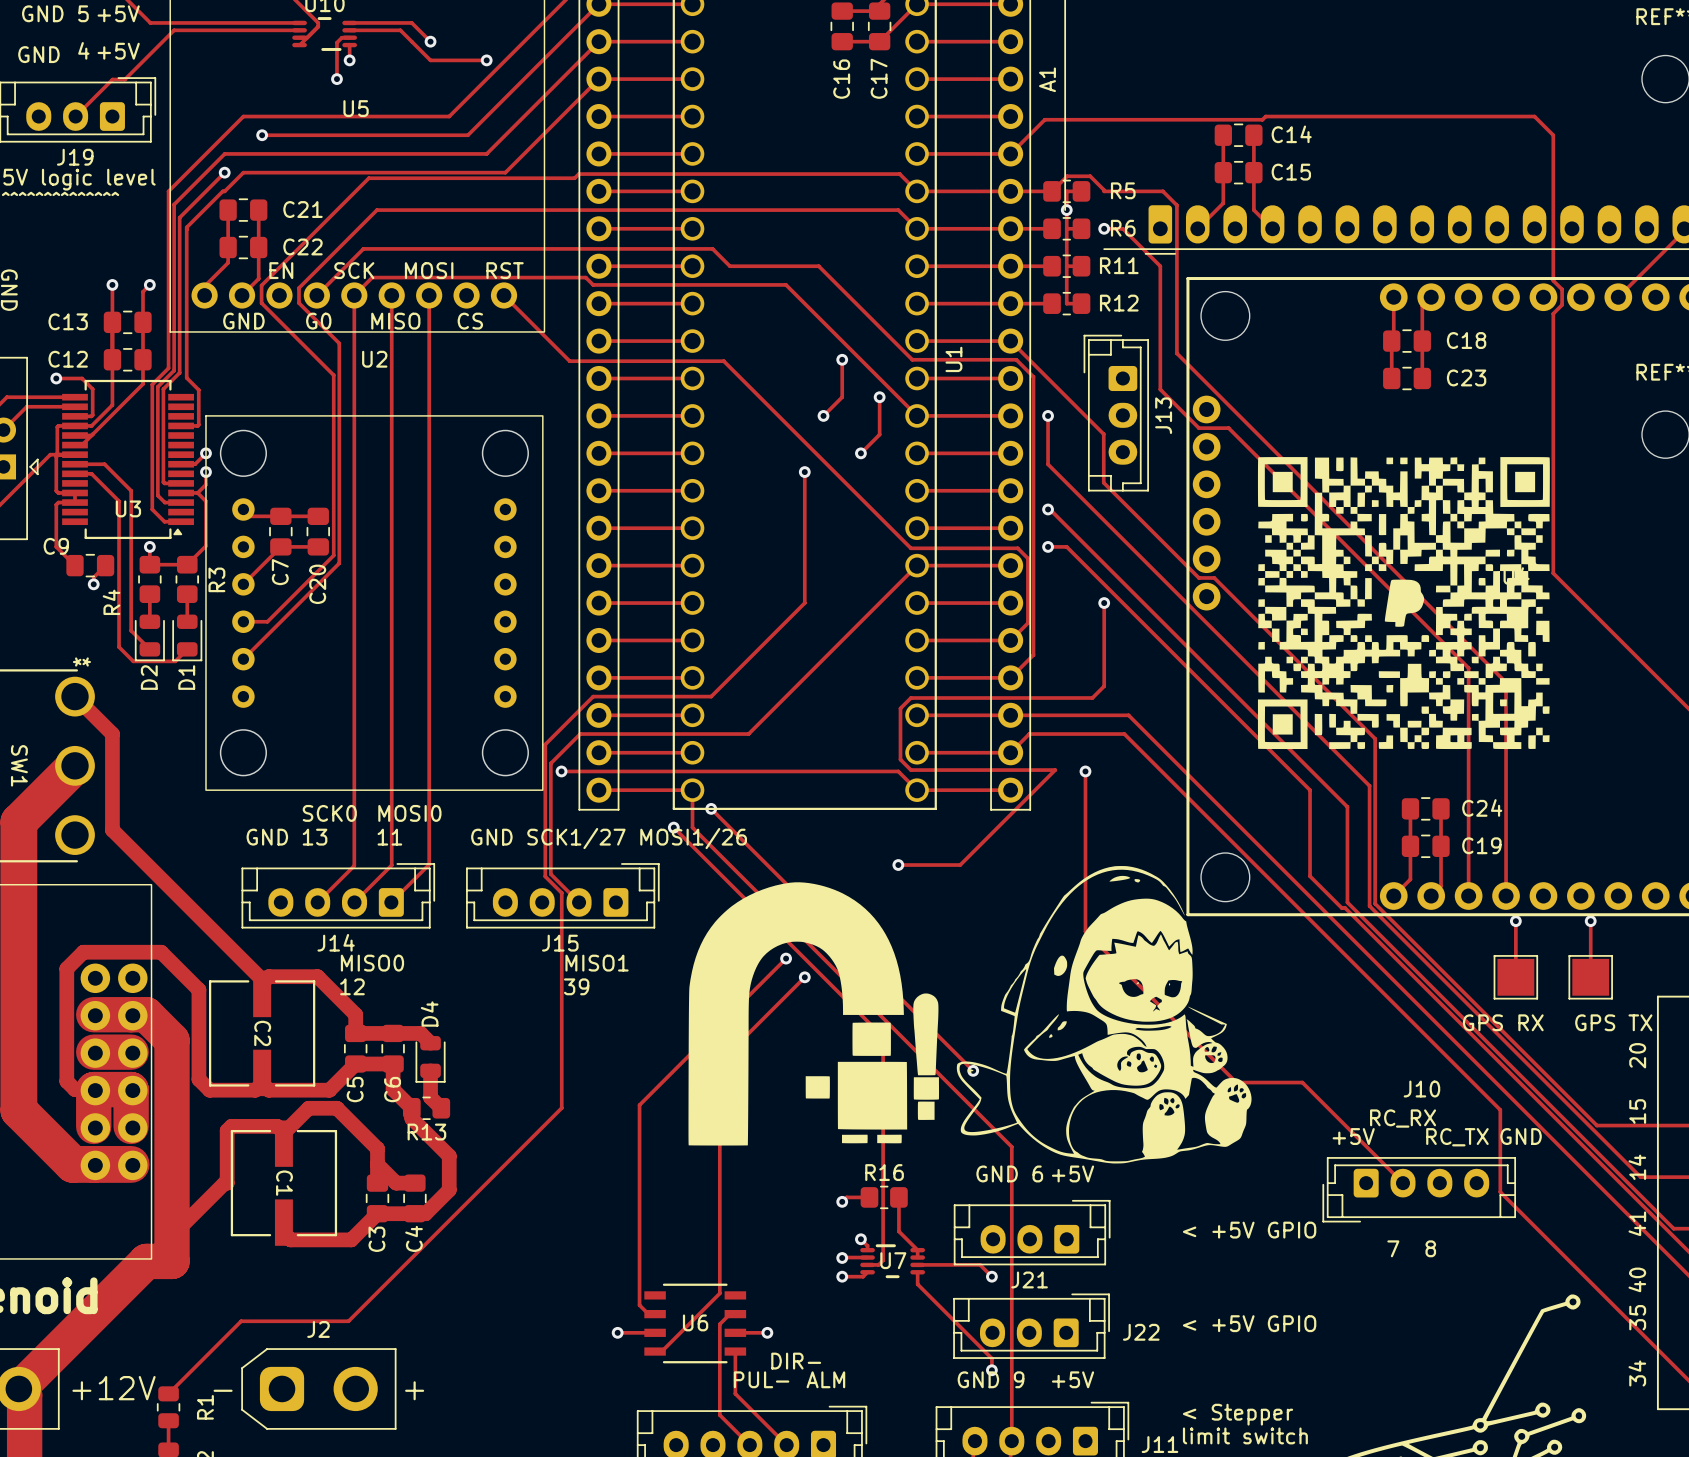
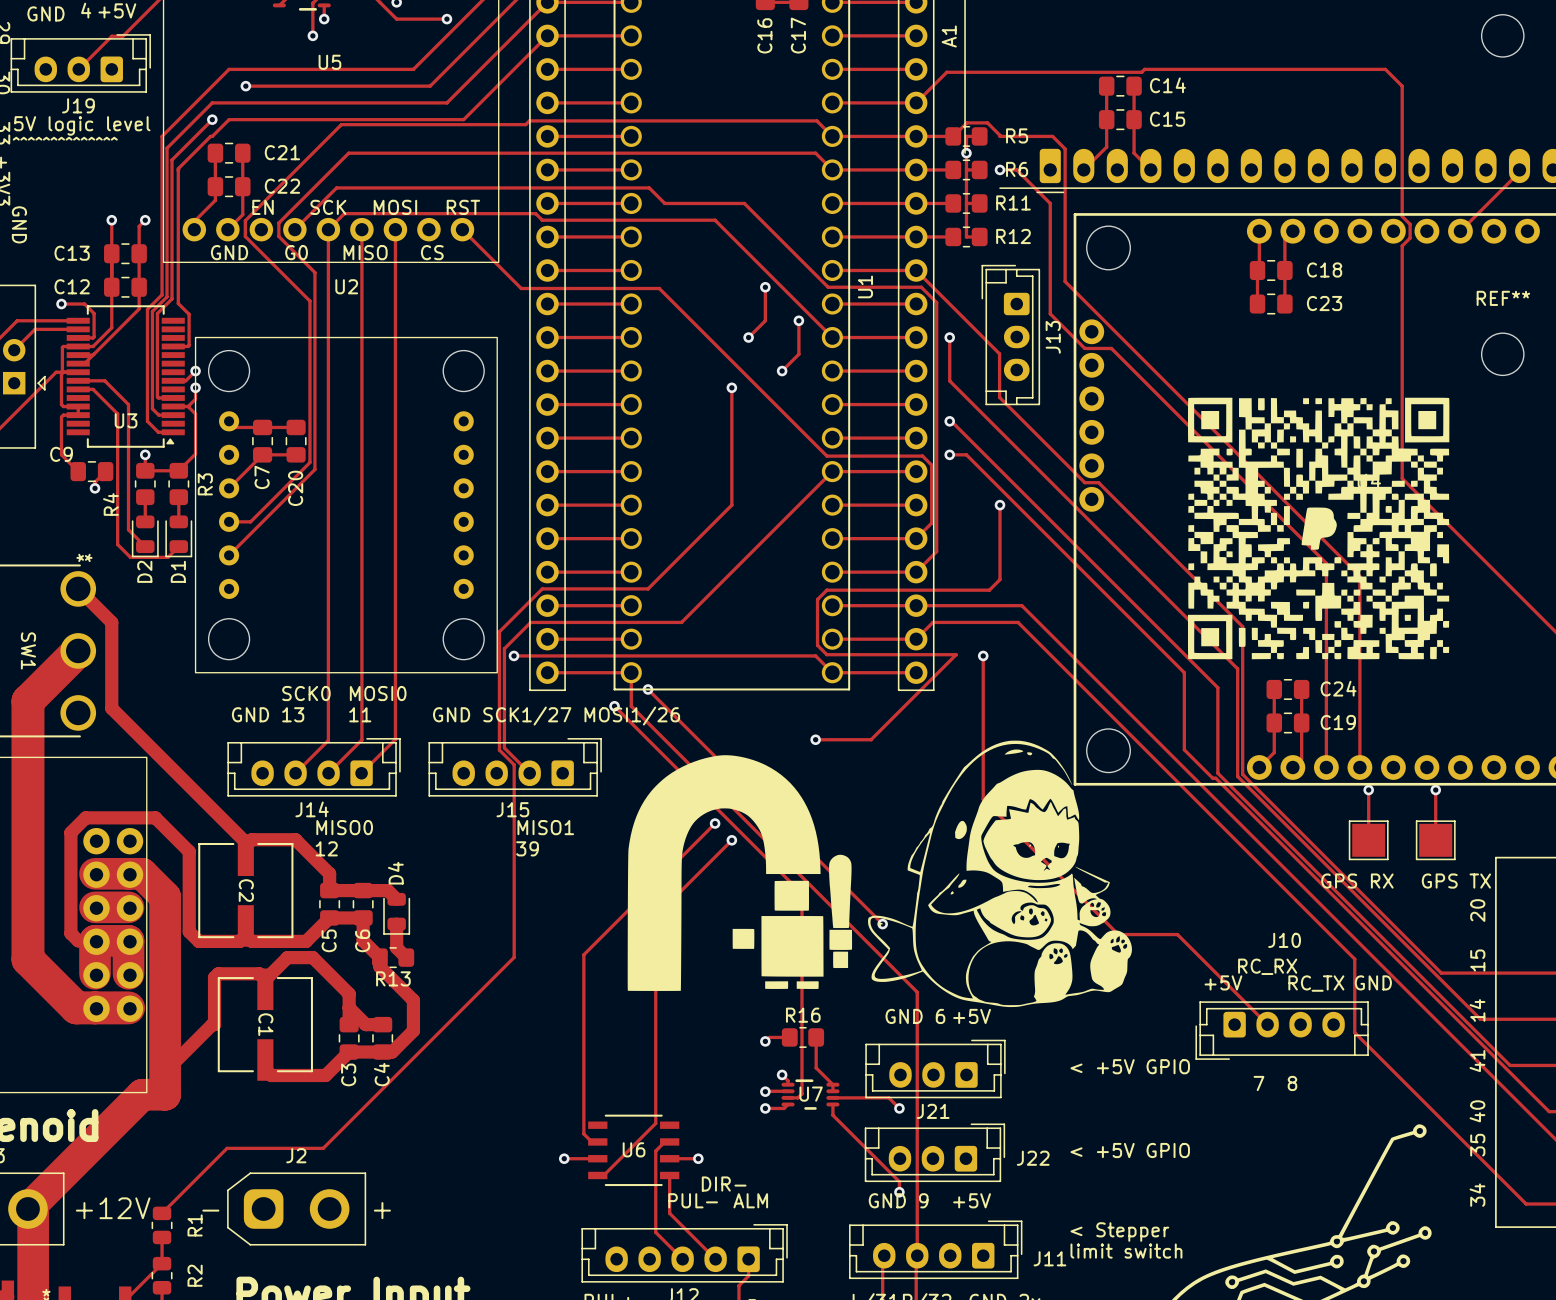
drawing position: (1403, 603) -> (1318, 528)

